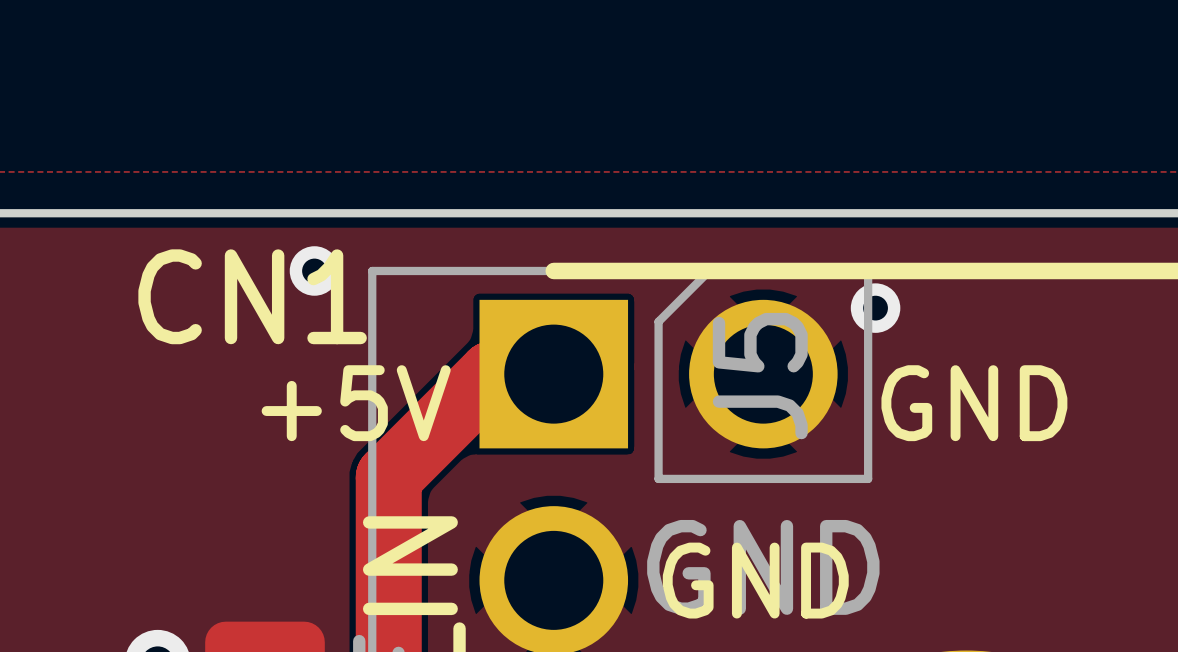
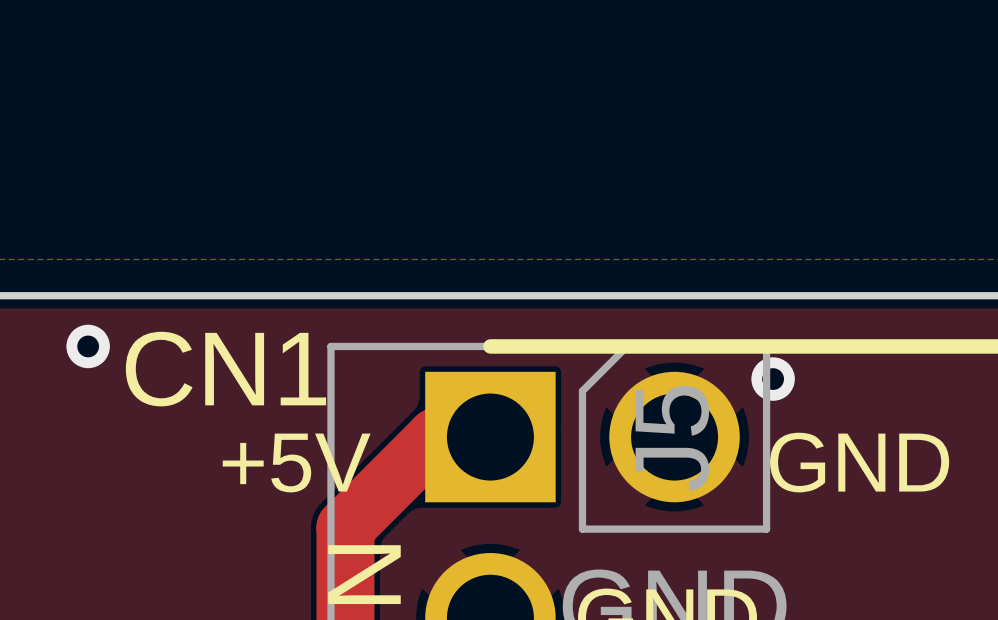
via position: (314, 270) -> (88, 346)

